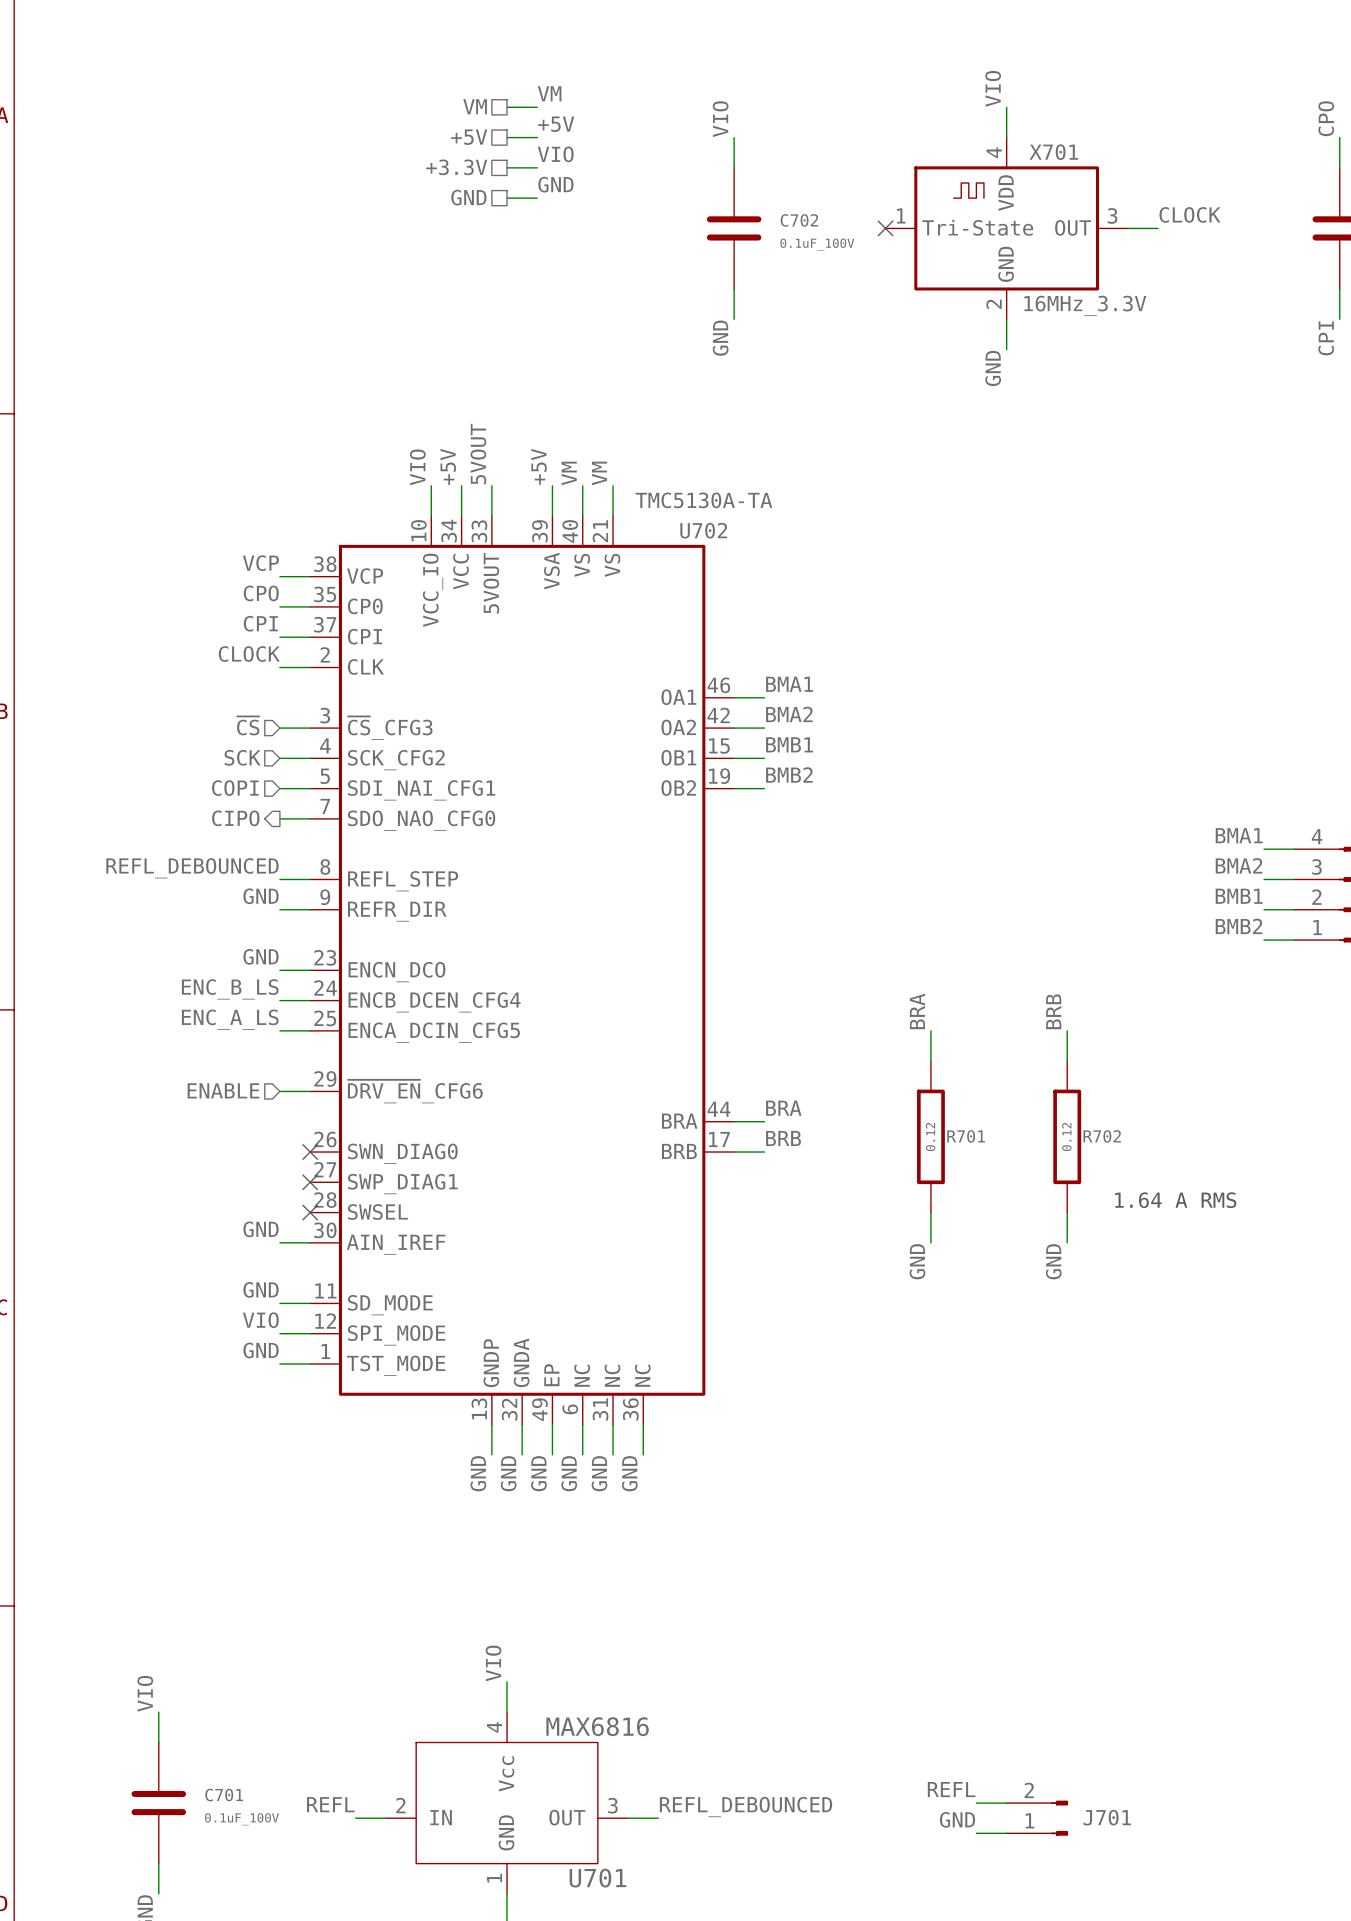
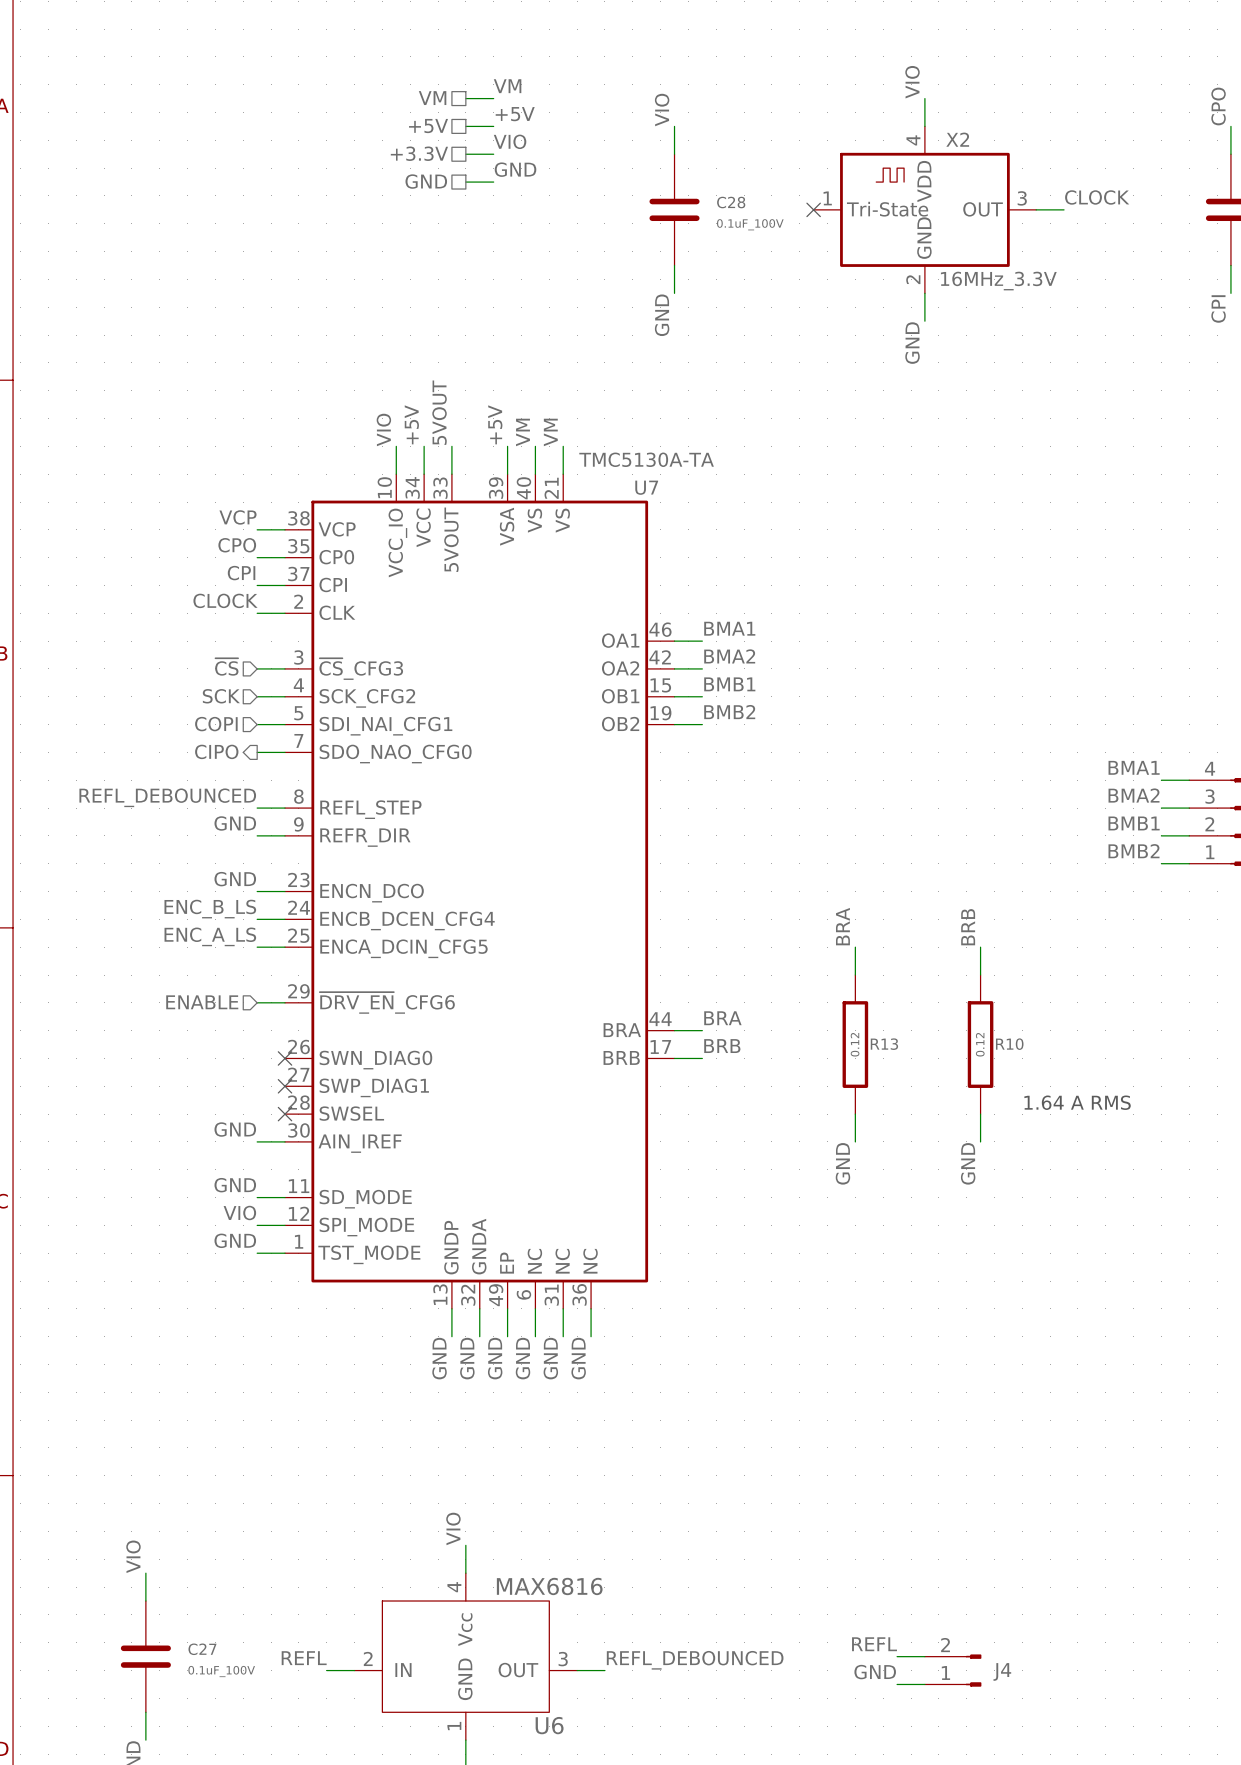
X701 name: X701 (1053, 152) -> X2 (957, 139)
C702 name: C702 (799, 220) -> C28 (731, 202)
U702 name: U702 (703, 530) -> U7 (646, 487)
R701 name: R701 (966, 1136) -> R13 (884, 1044)
R702 name: R702 (1102, 1136) -> R10 (1009, 1044)
C701 name: C701 (224, 1795) -> C27 (202, 1649)
J701 name: J701 (1107, 1817) -> J4 (1002, 1671)
U701 name: U701 (597, 1878) -> U6 (549, 1725)

